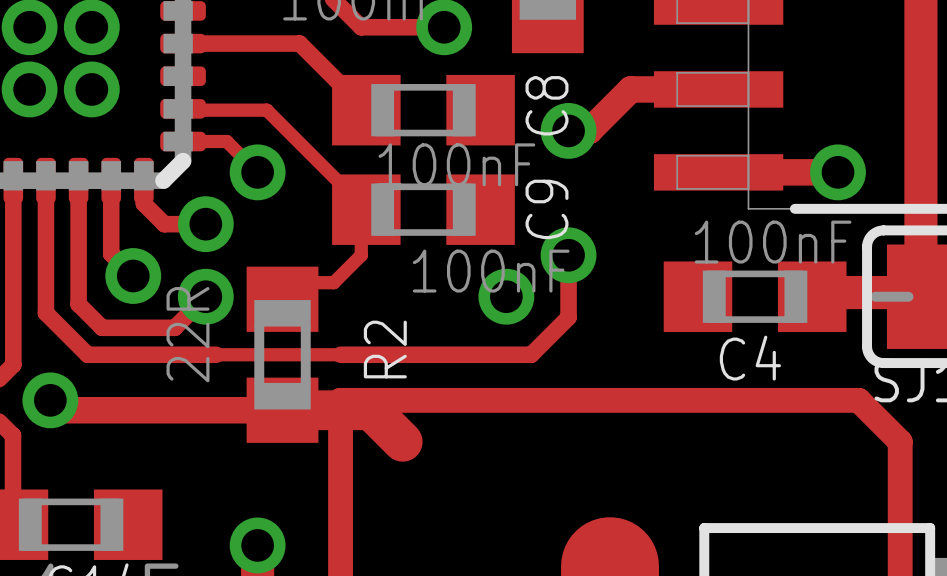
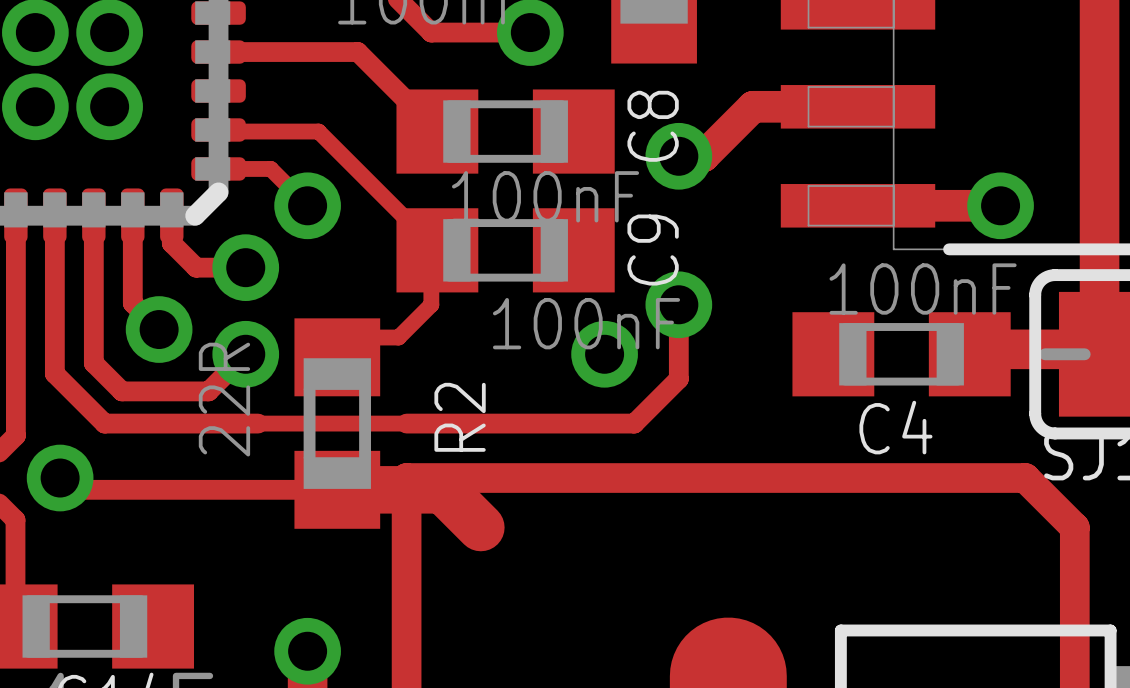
track width: thick (50, 400) (60, 410) (282, 410) -> thin (60, 478) (71, 489) (337, 489)

